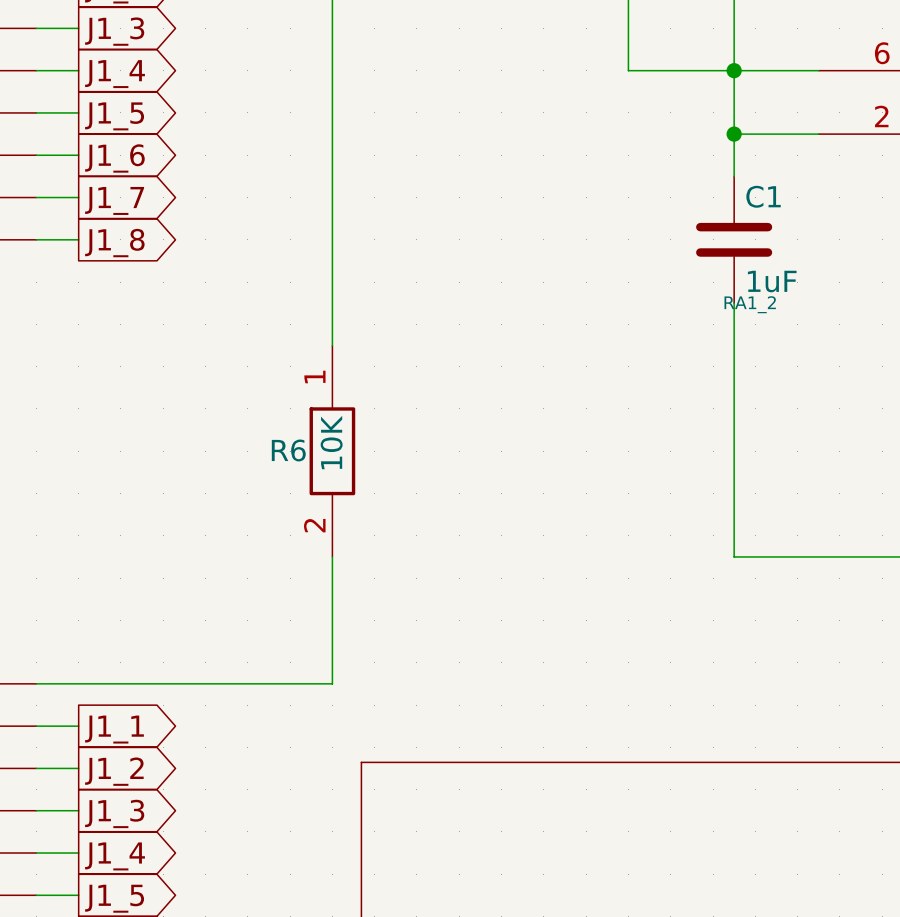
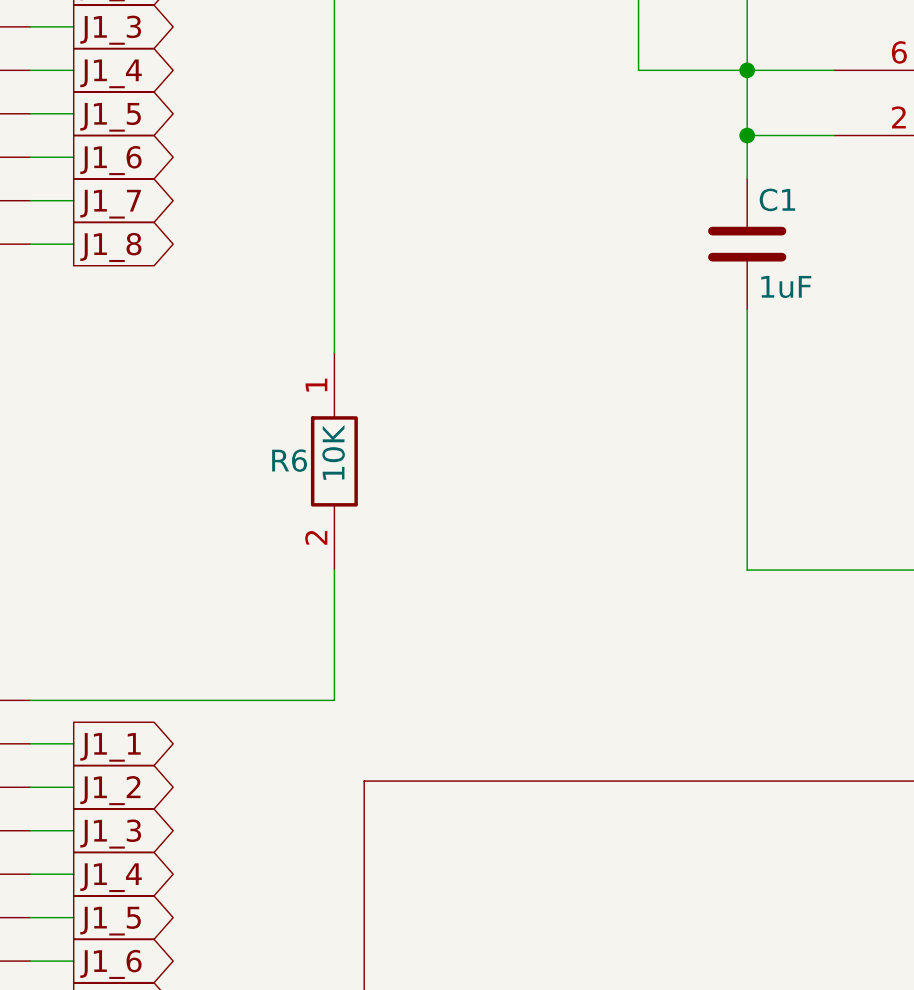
C1 text: RA1_2 (750, 304) -> none

